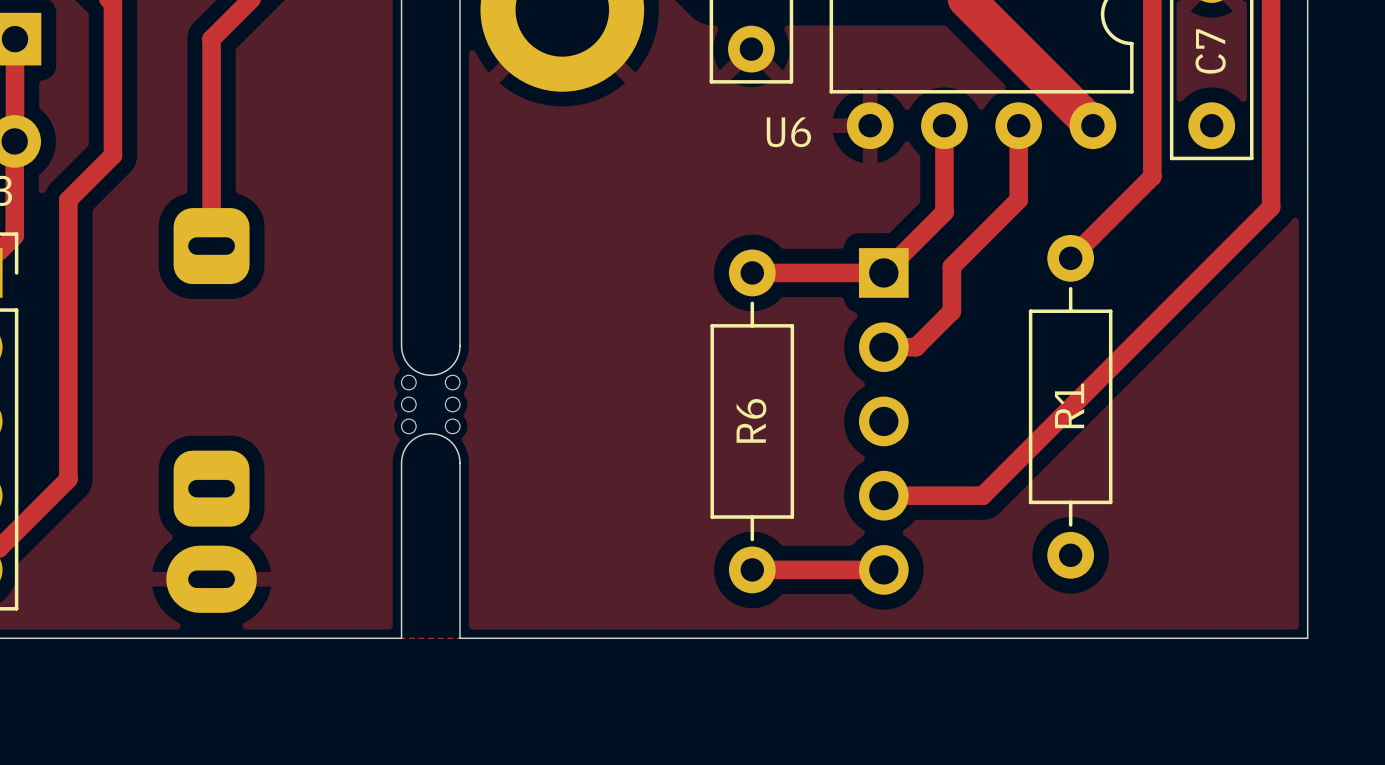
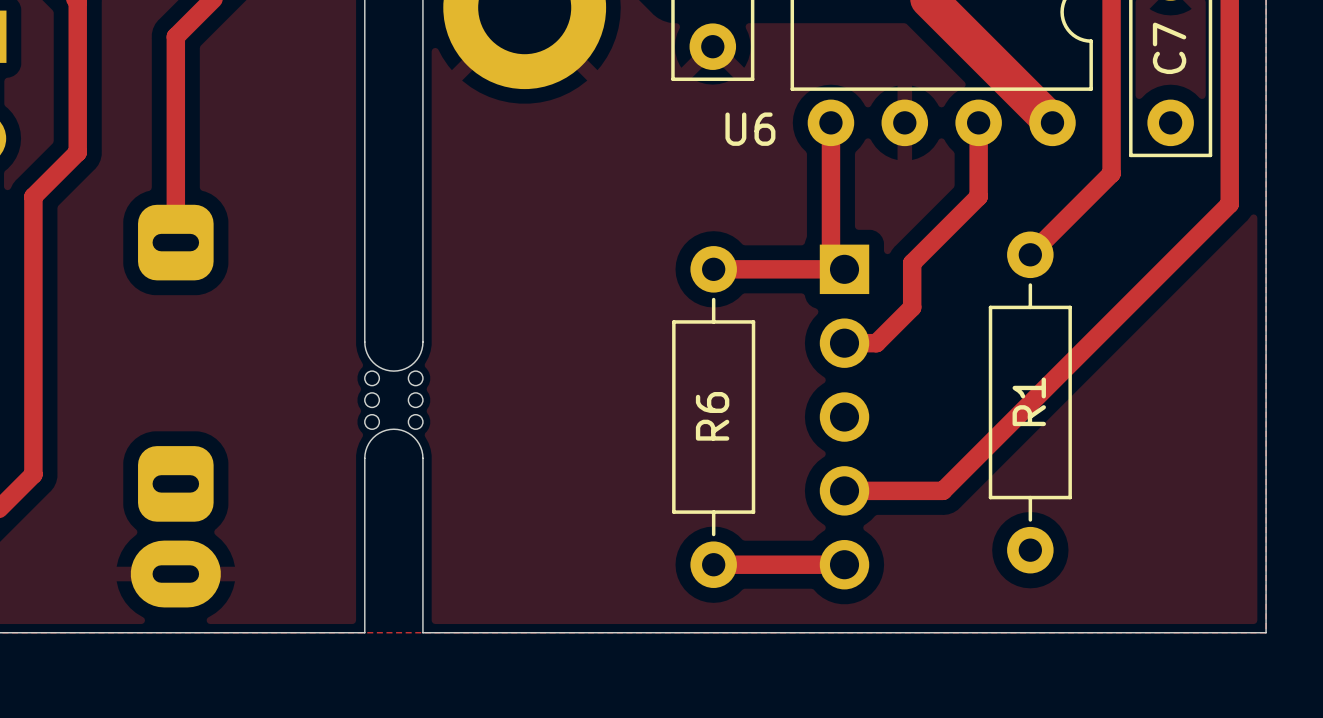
track: (944, 125) (944, 212) (883, 272) -> (830, 122) (830, 255) (844, 269)

